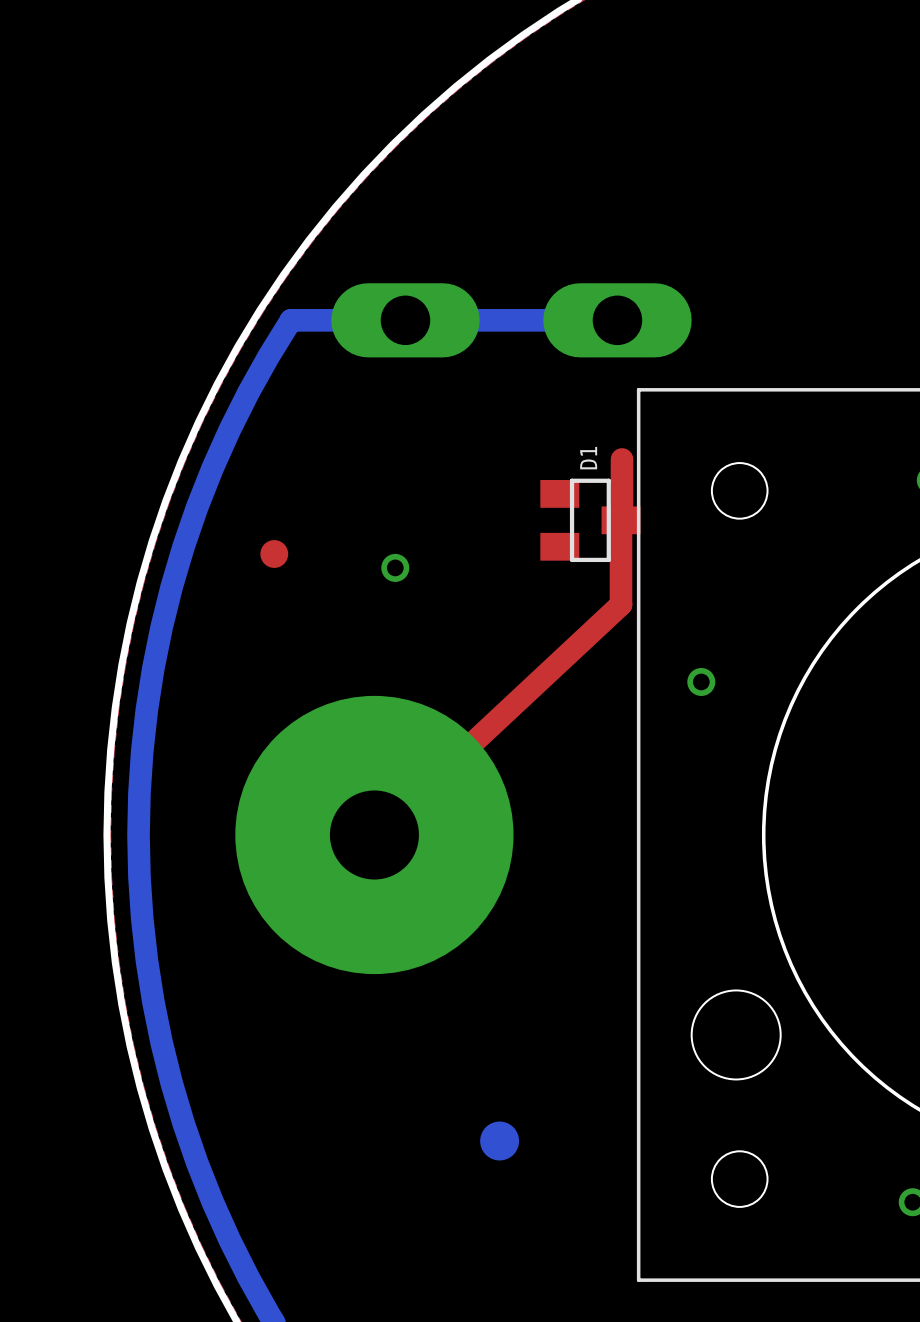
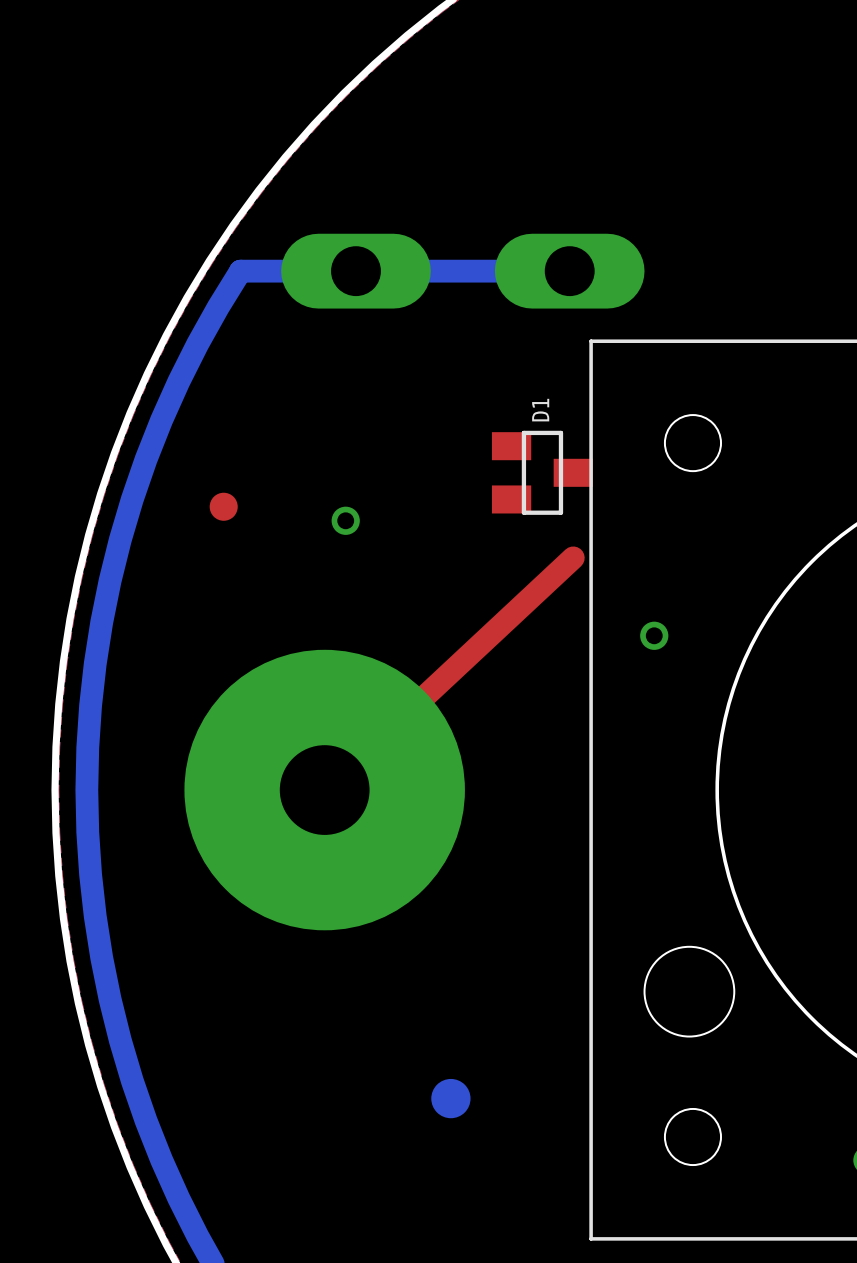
top track: (622, 459) (621, 604) -> none

